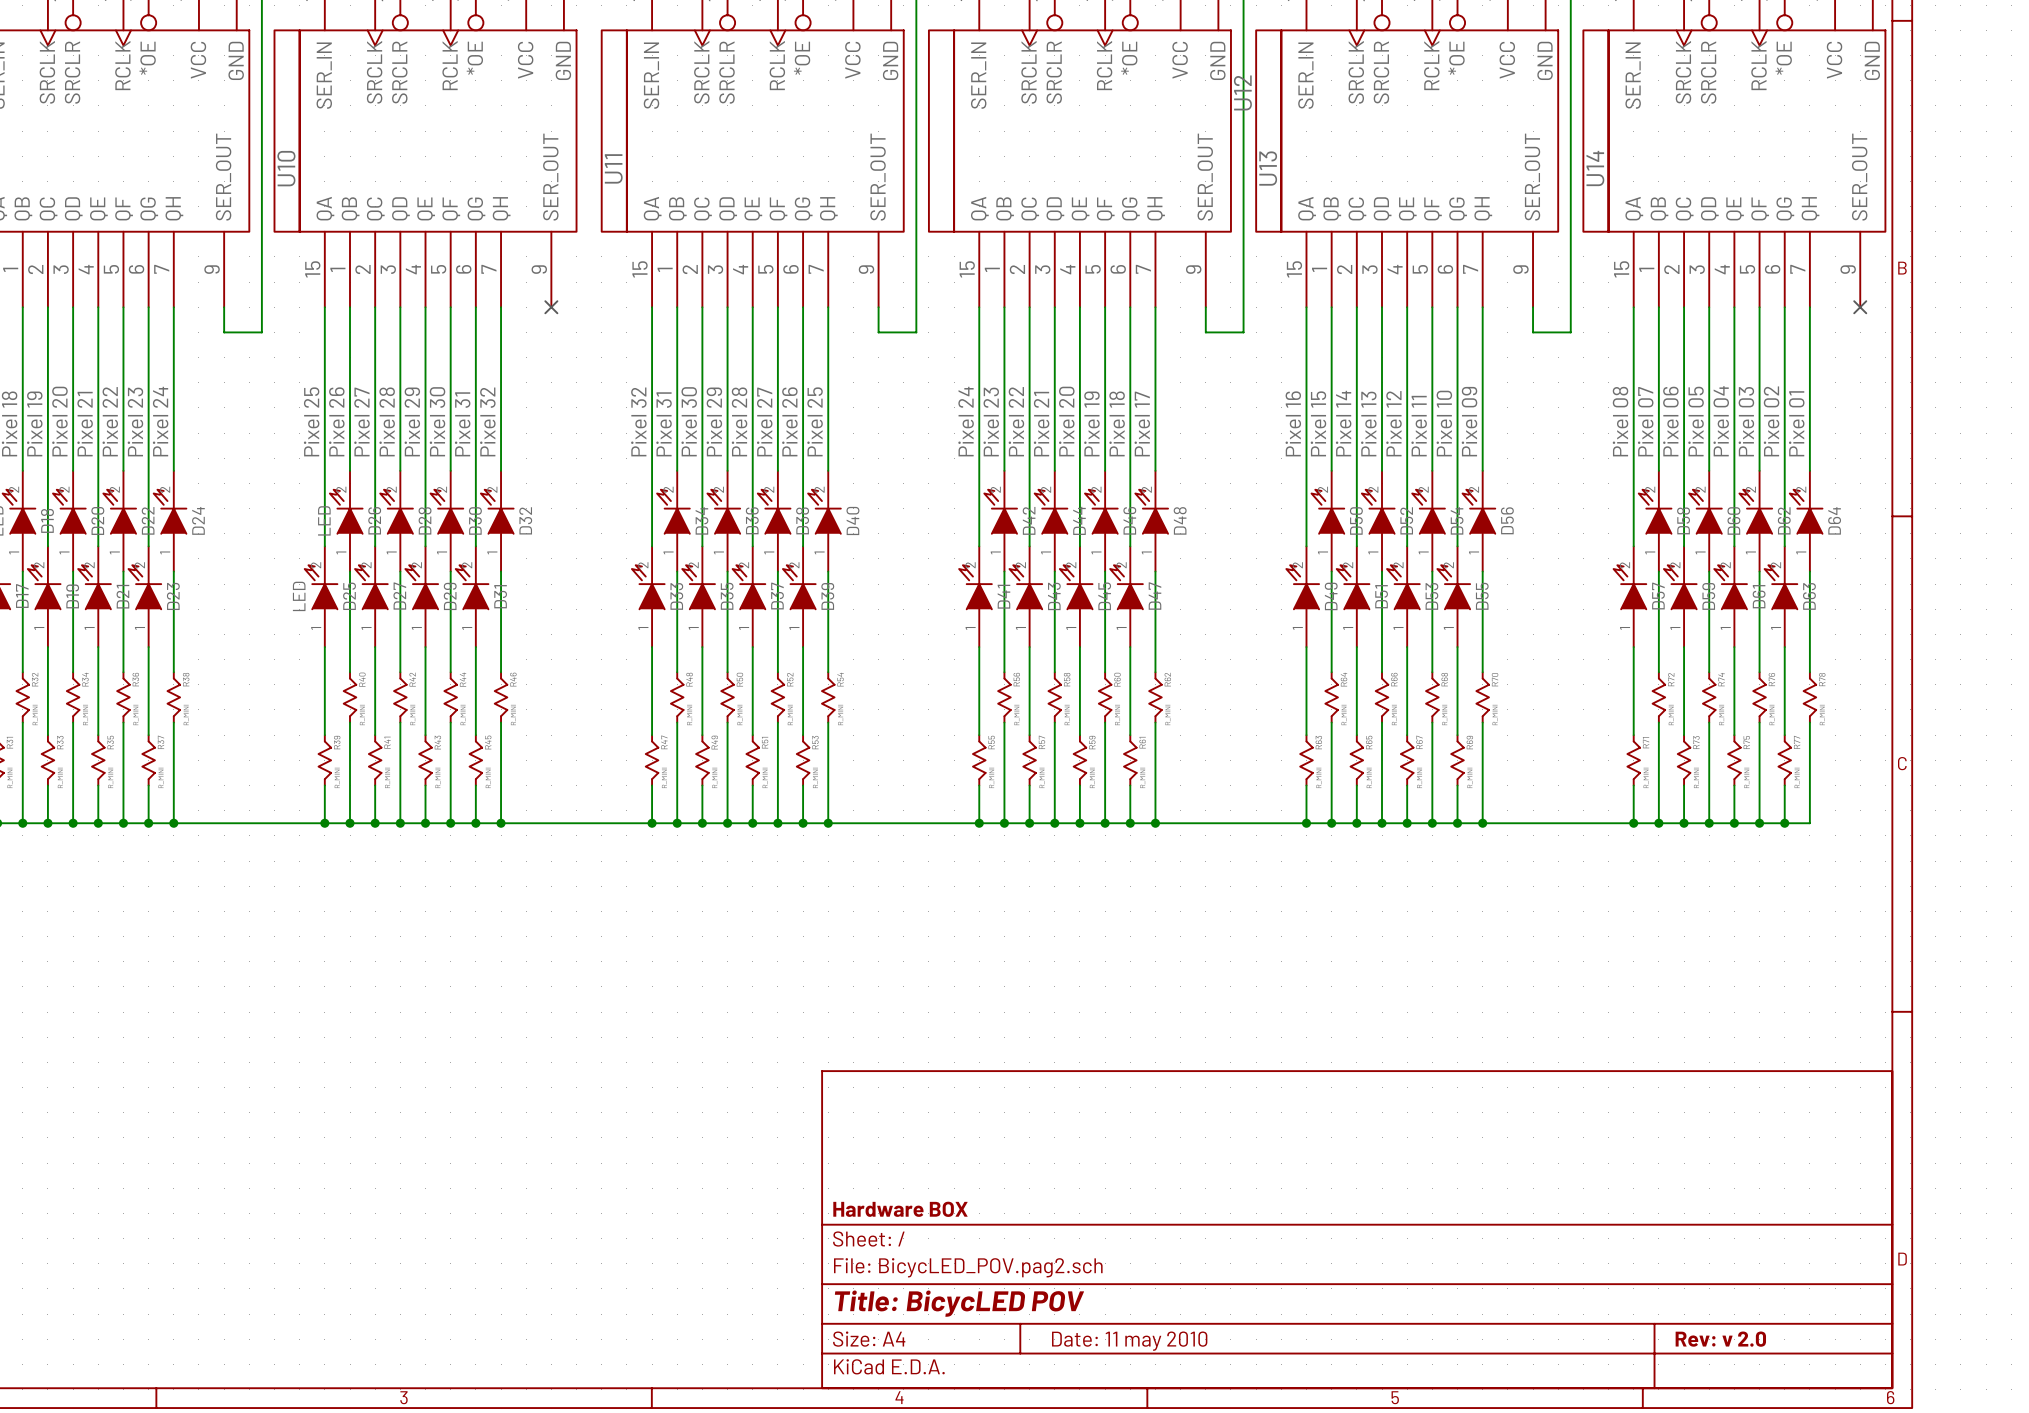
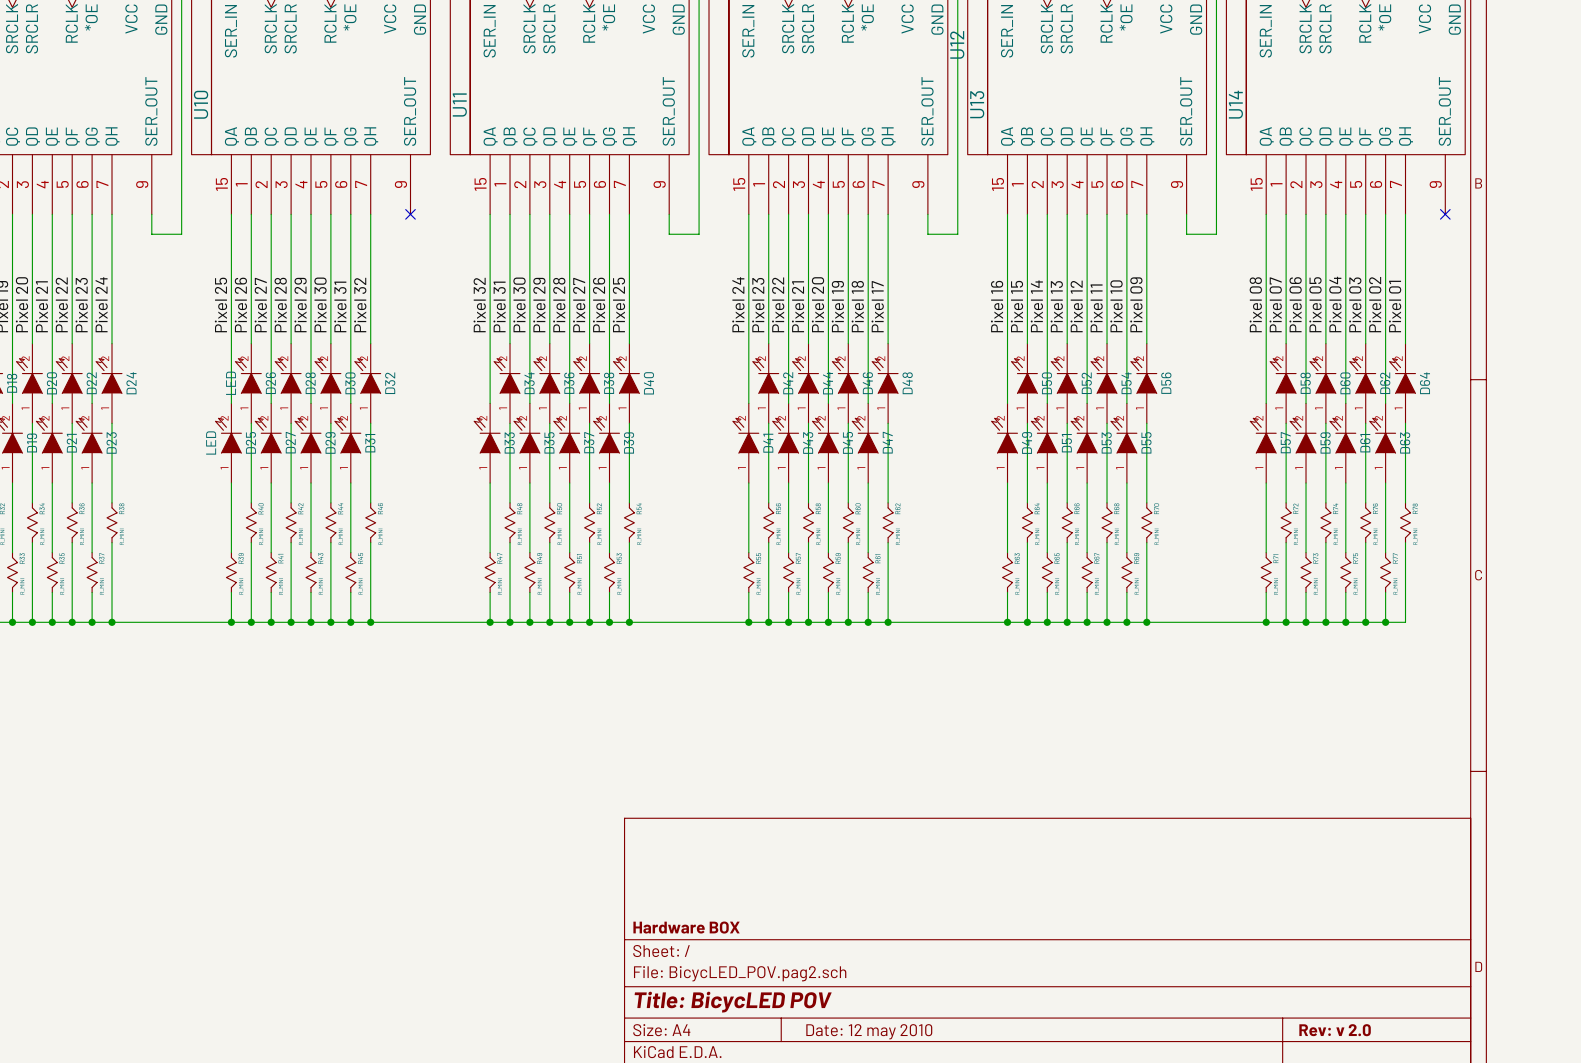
title block: Date: 11 may 2010 (1129, 1341) -> Date: 12 may 2010 (869, 1031)

